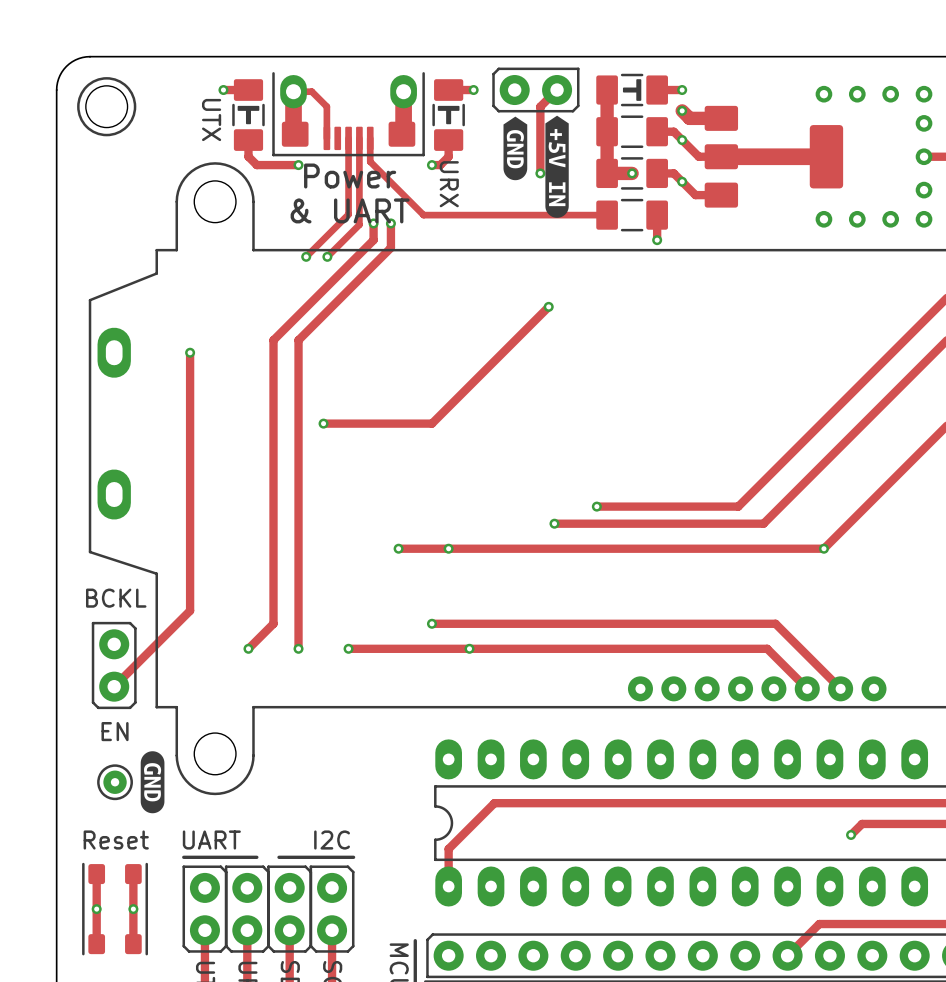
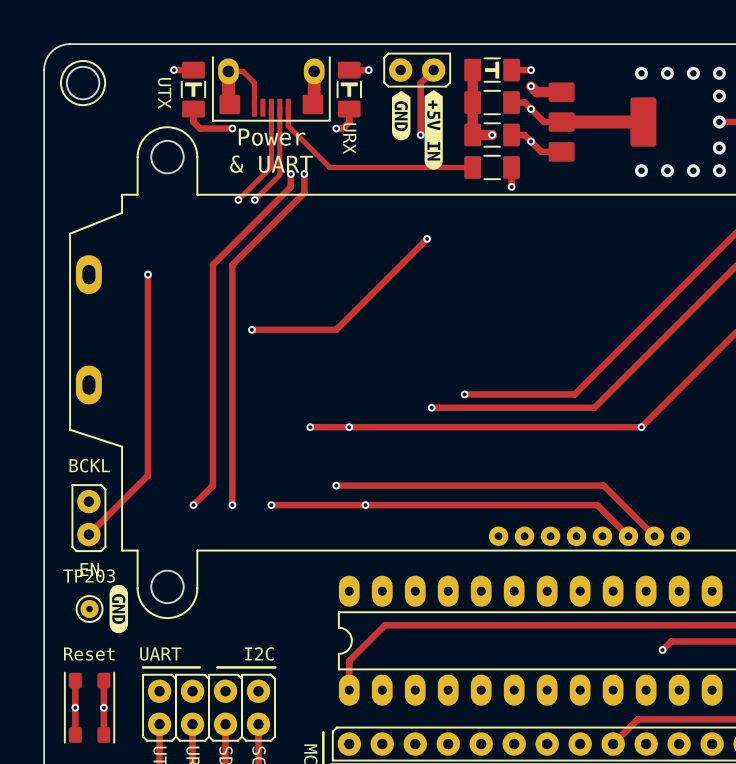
TP203 name: none -> TP203 (89, 576)

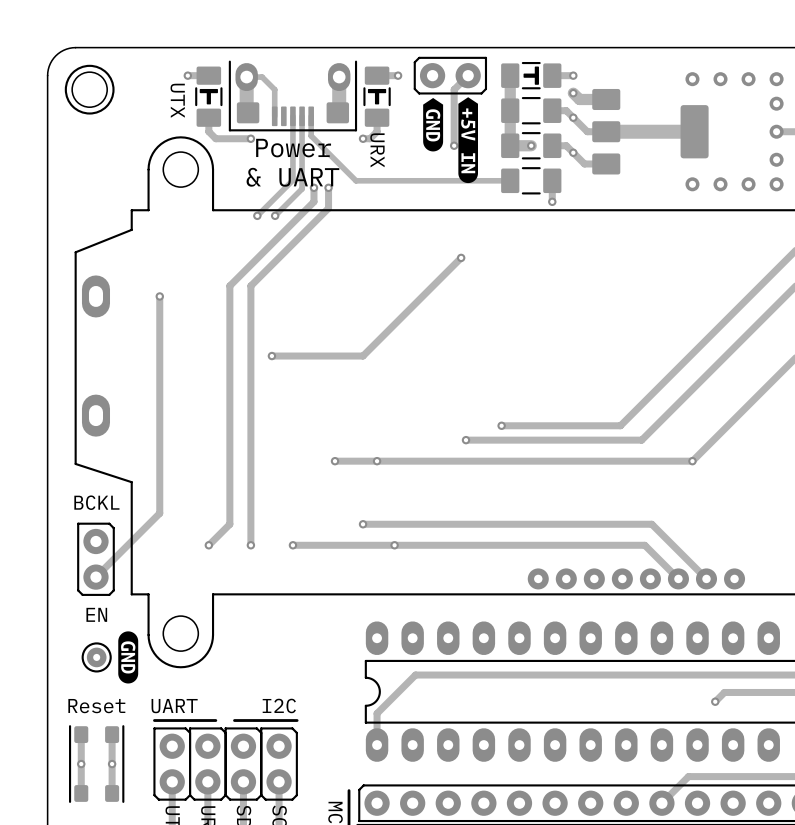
TP203 name: TP203 (89, 576) -> none

